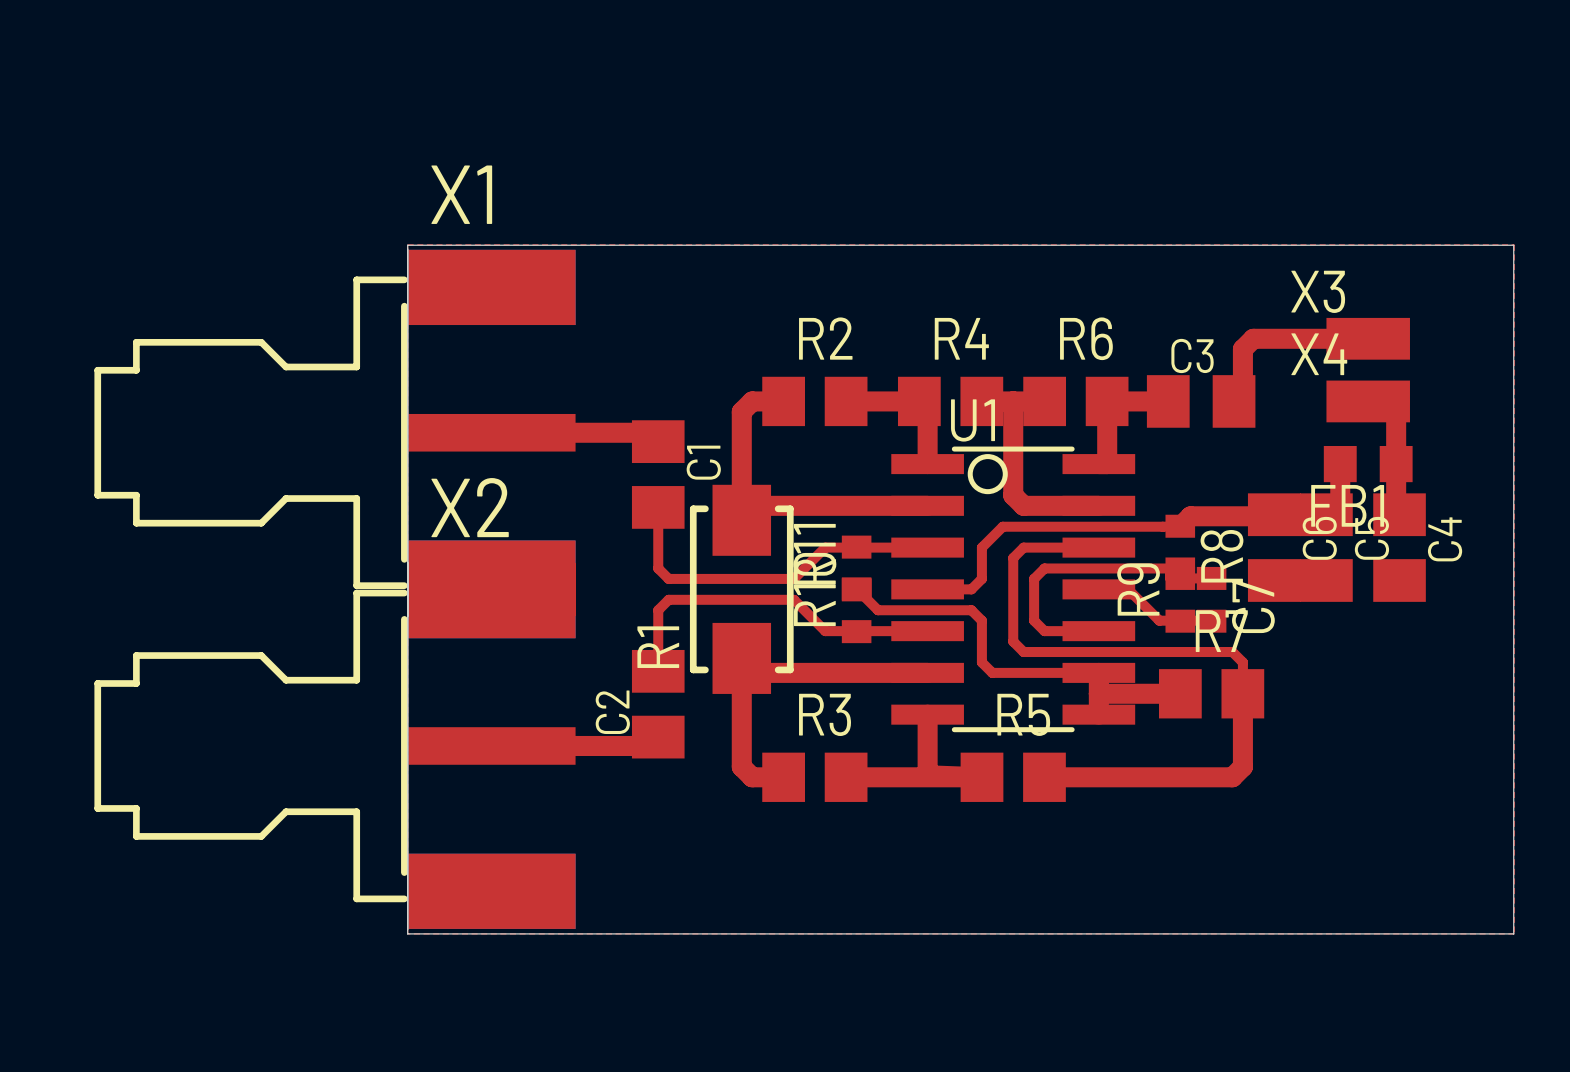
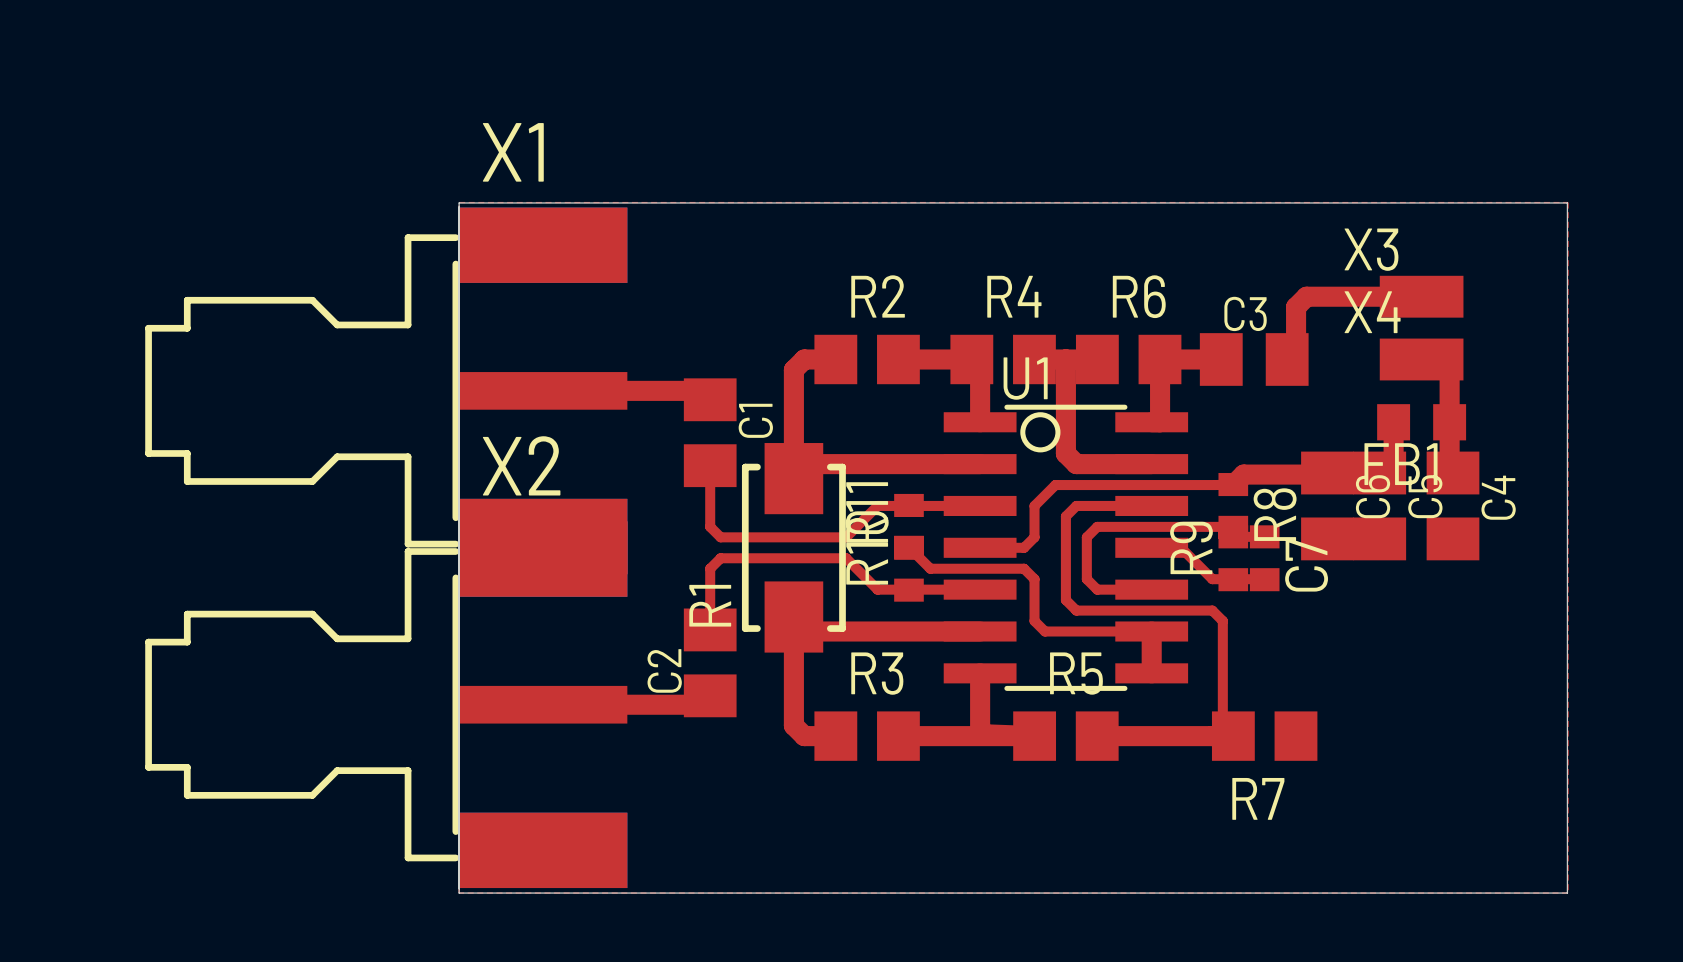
R7 name position: R7 (1221, 631) -> R7 (1258, 798)
top track: (1159, 652) (1232, 652) (1242, 662) (1242, 693) -> (1212, 610) (1222, 621) (1222, 725) (1212, 736)
top track: (1098, 693) (1180, 693) -> none
R7 position: (1211, 693) -> (1264, 736)
top track: (1242, 693) (1242, 766) (1232, 777) (1180, 777) -> none

